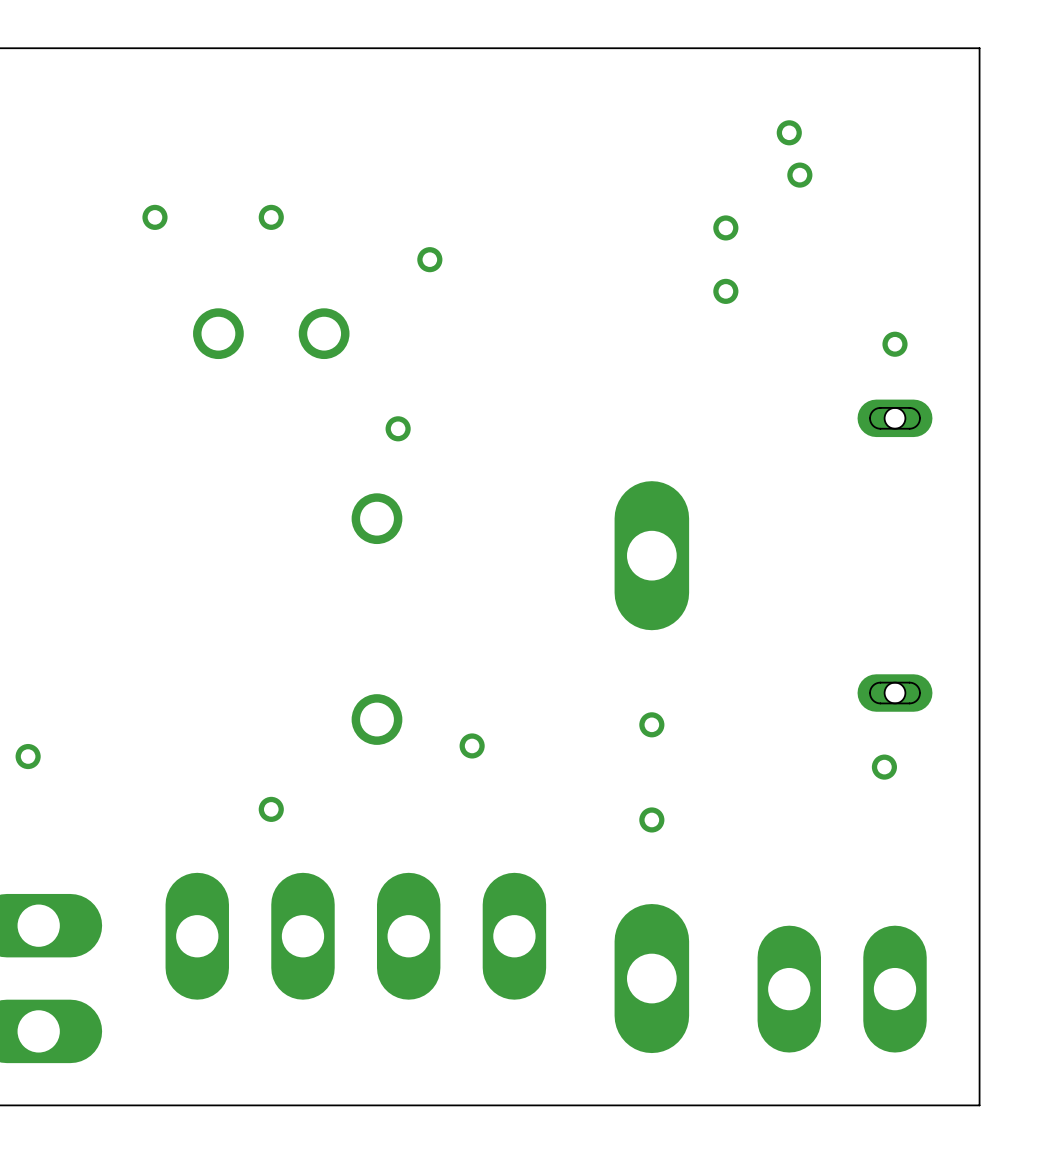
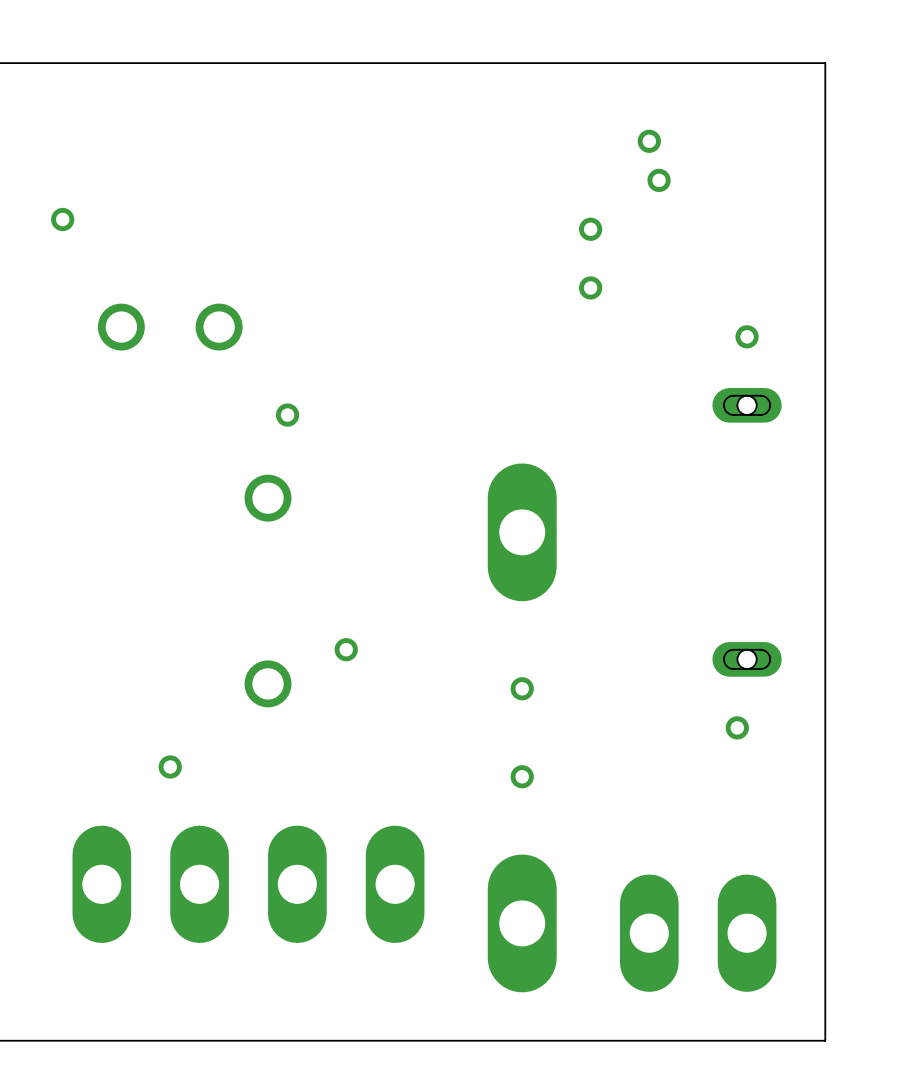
via: (271, 217) -> none
via: (429, 259) -> none
via position: (472, 745) -> (346, 649)

